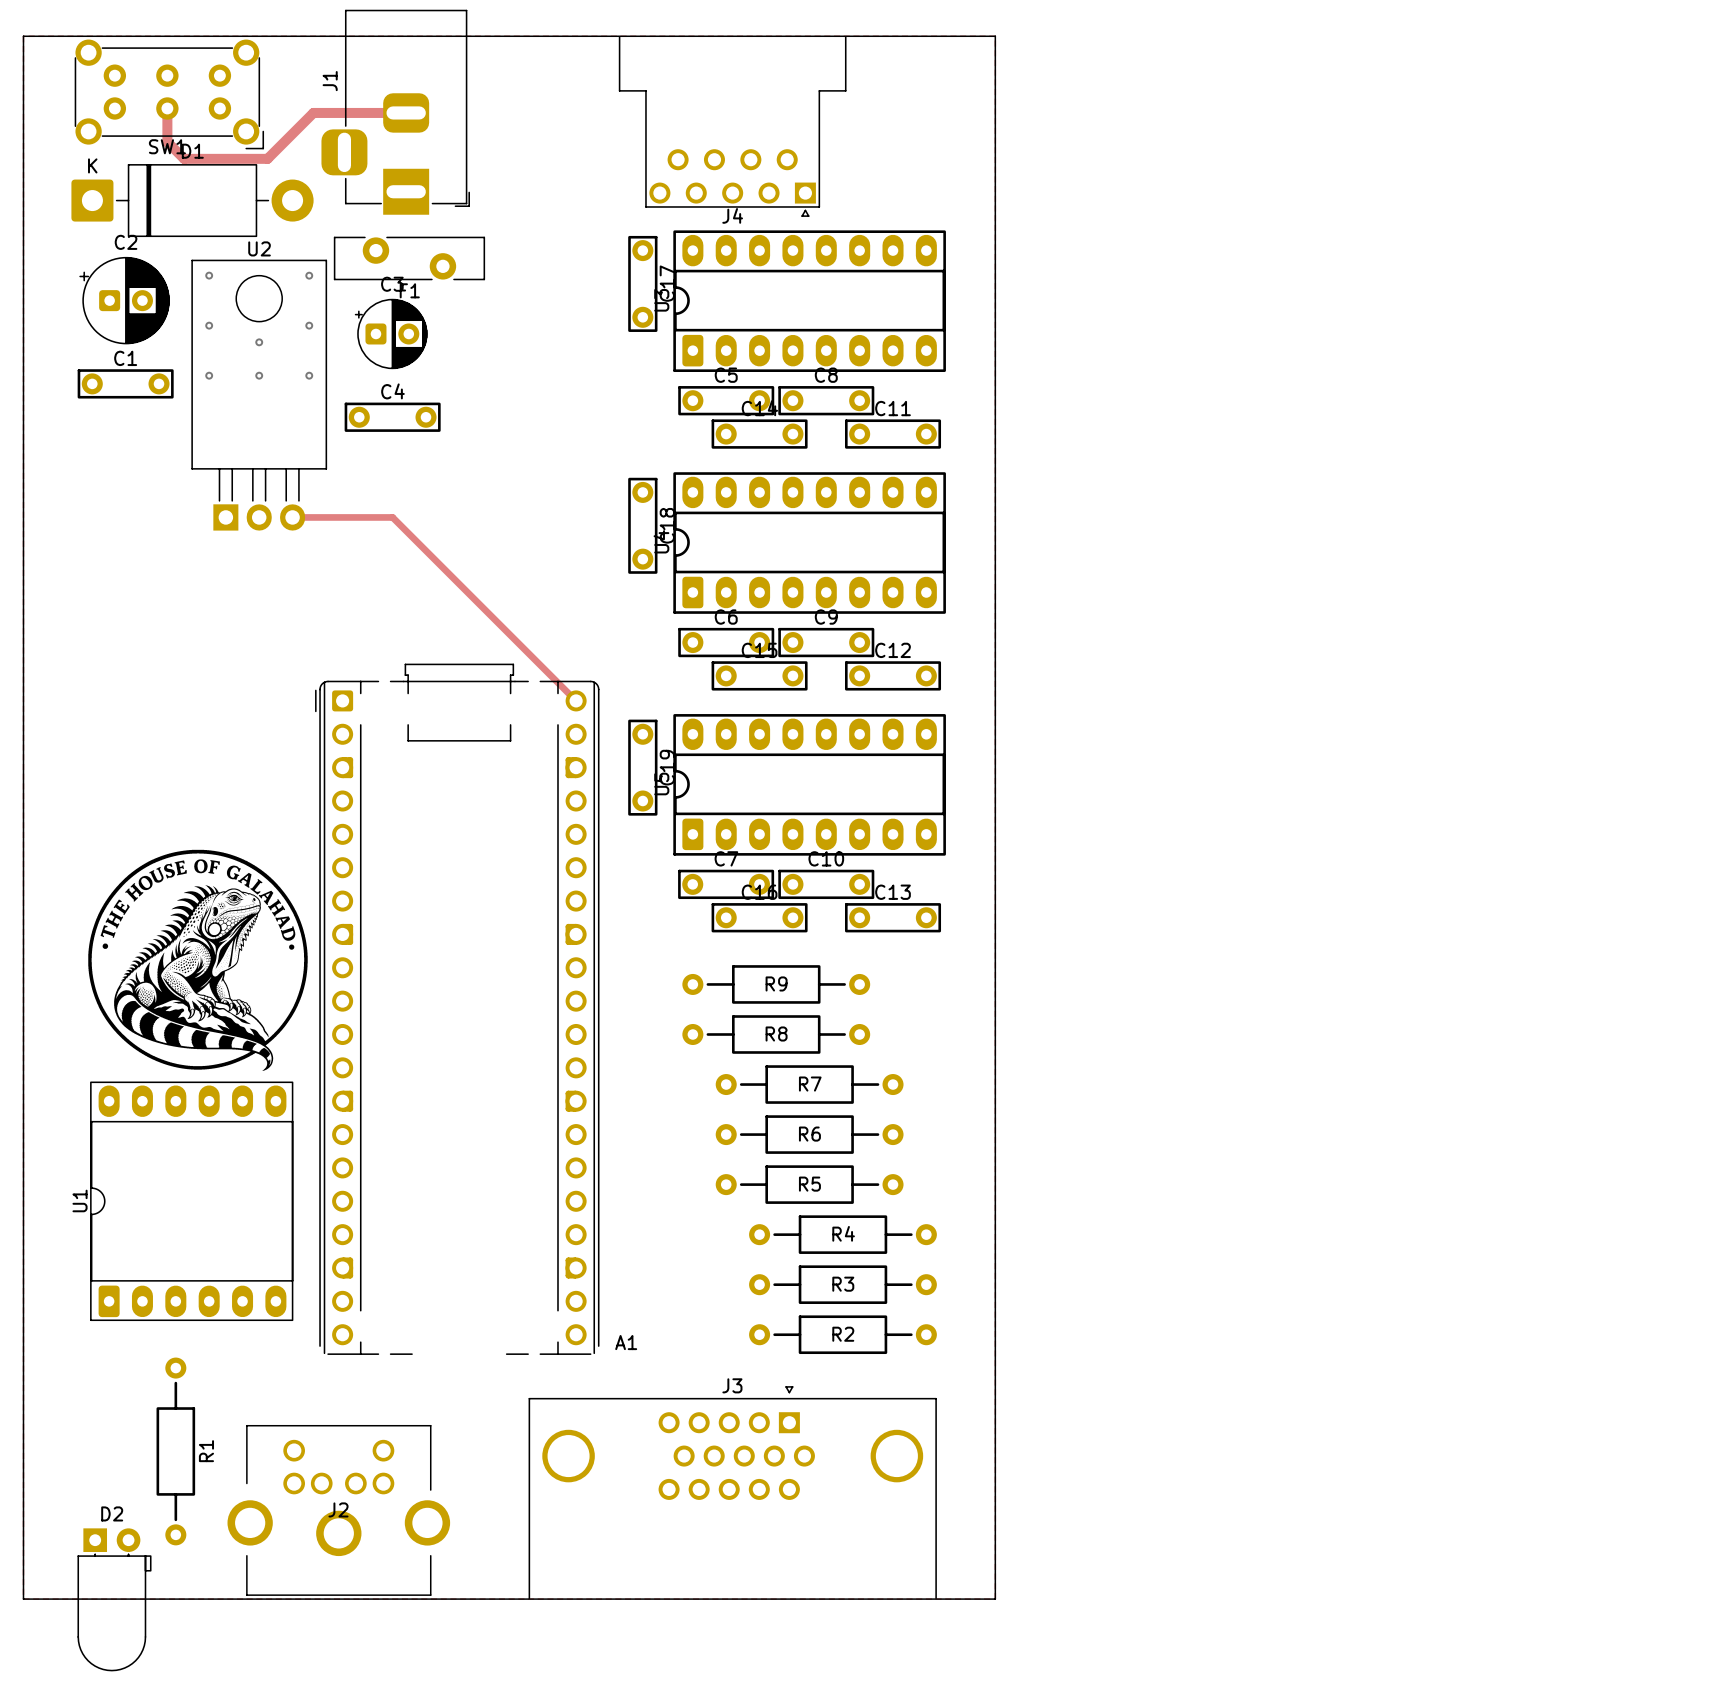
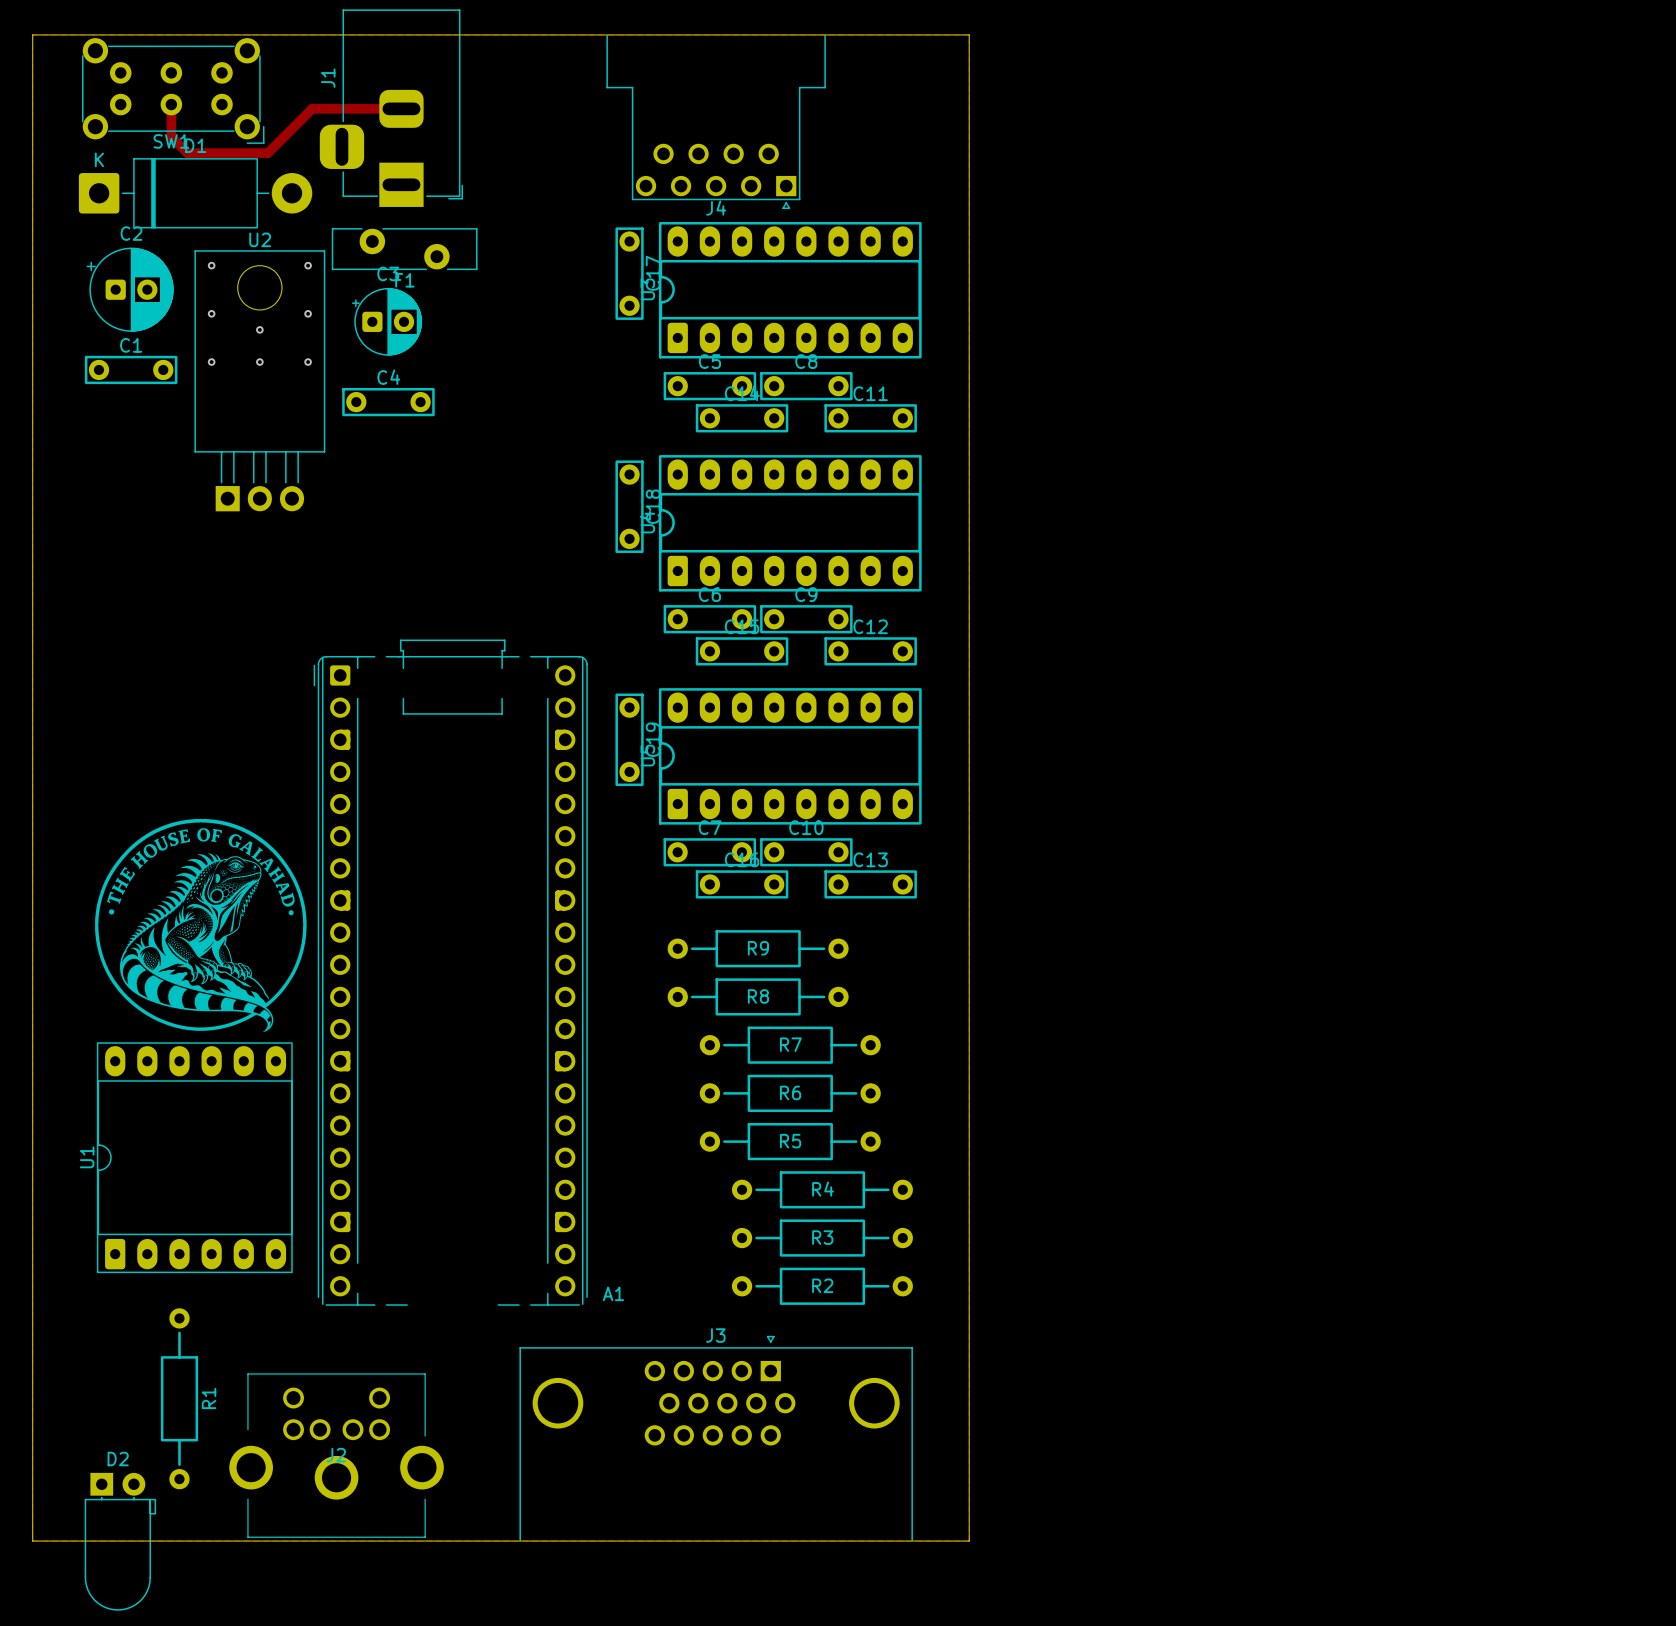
track: (292, 517) (392, 517) (576, 700) -> none

